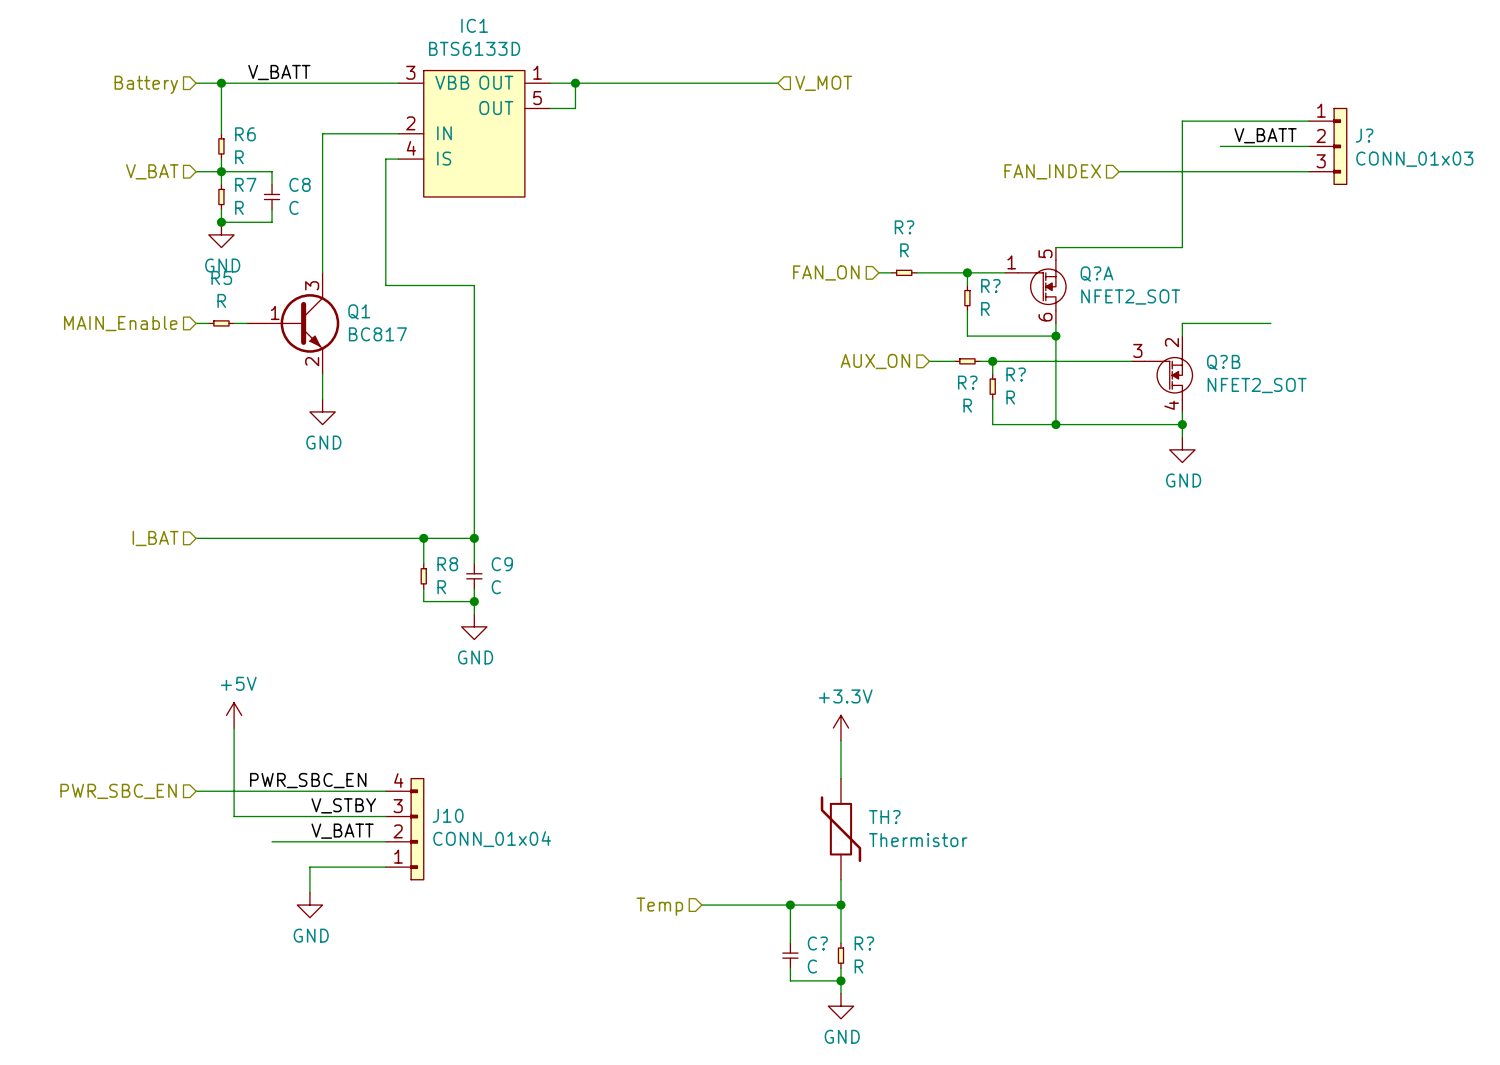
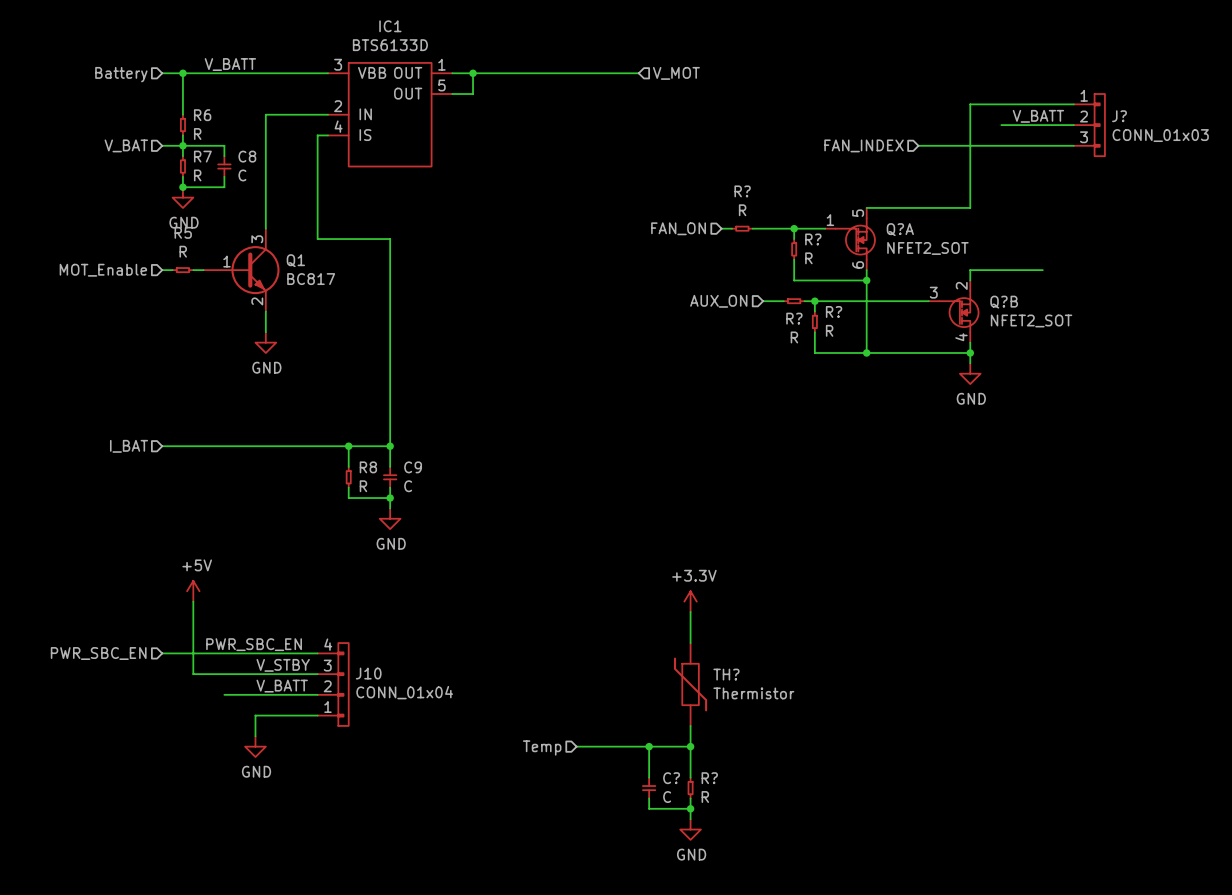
hierarchical label: MAIN_Enable (120, 323) -> MOT_Enable (103, 270)

